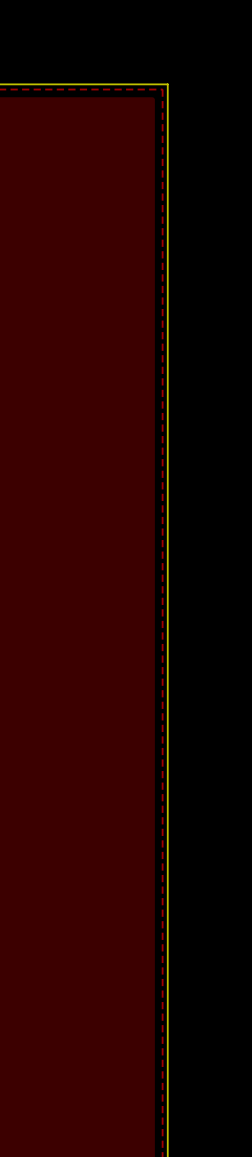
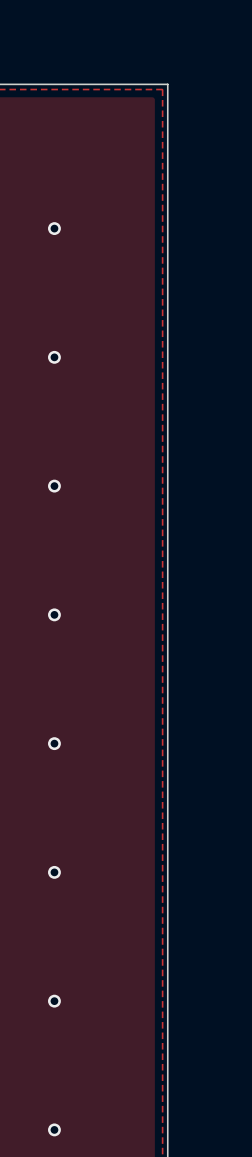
via: none -> (54, 228)
via: none -> (54, 357)
via: none -> (54, 486)
via: none -> (54, 614)
via: none -> (54, 743)
via: none -> (54, 872)
via: none -> (54, 1001)
via: none -> (54, 1129)

